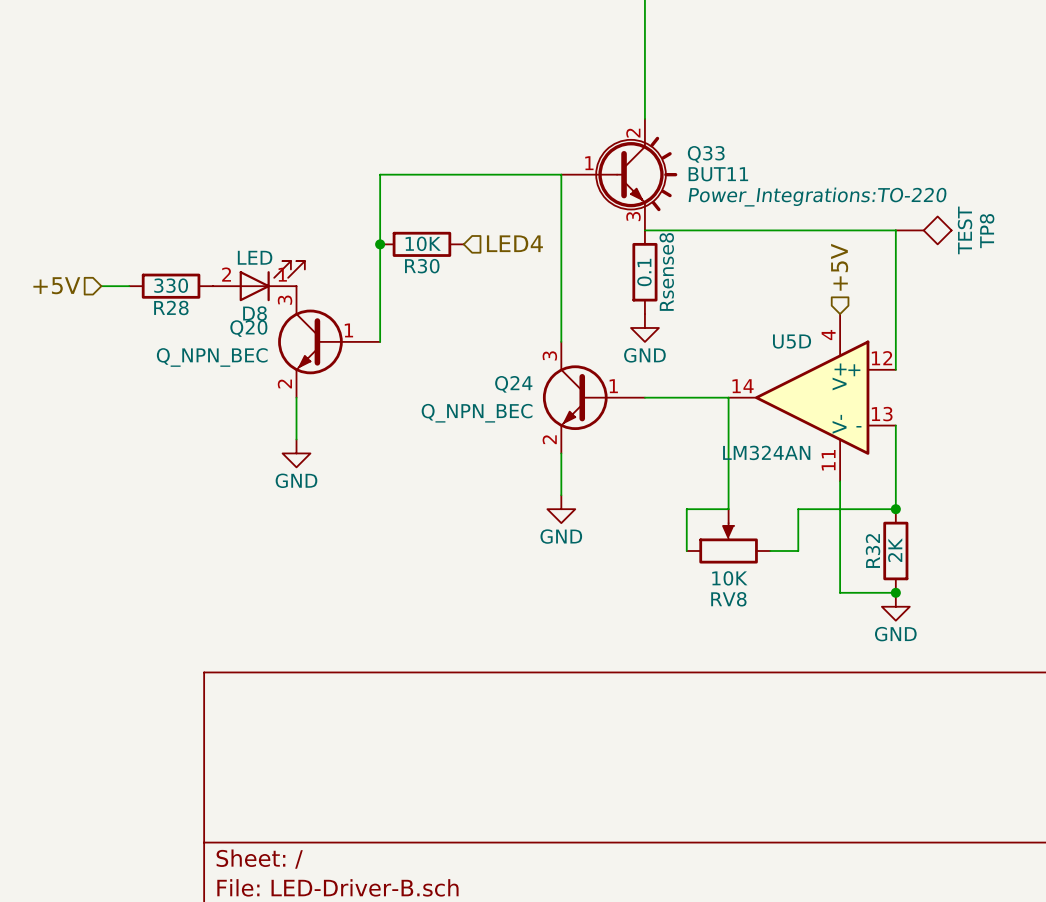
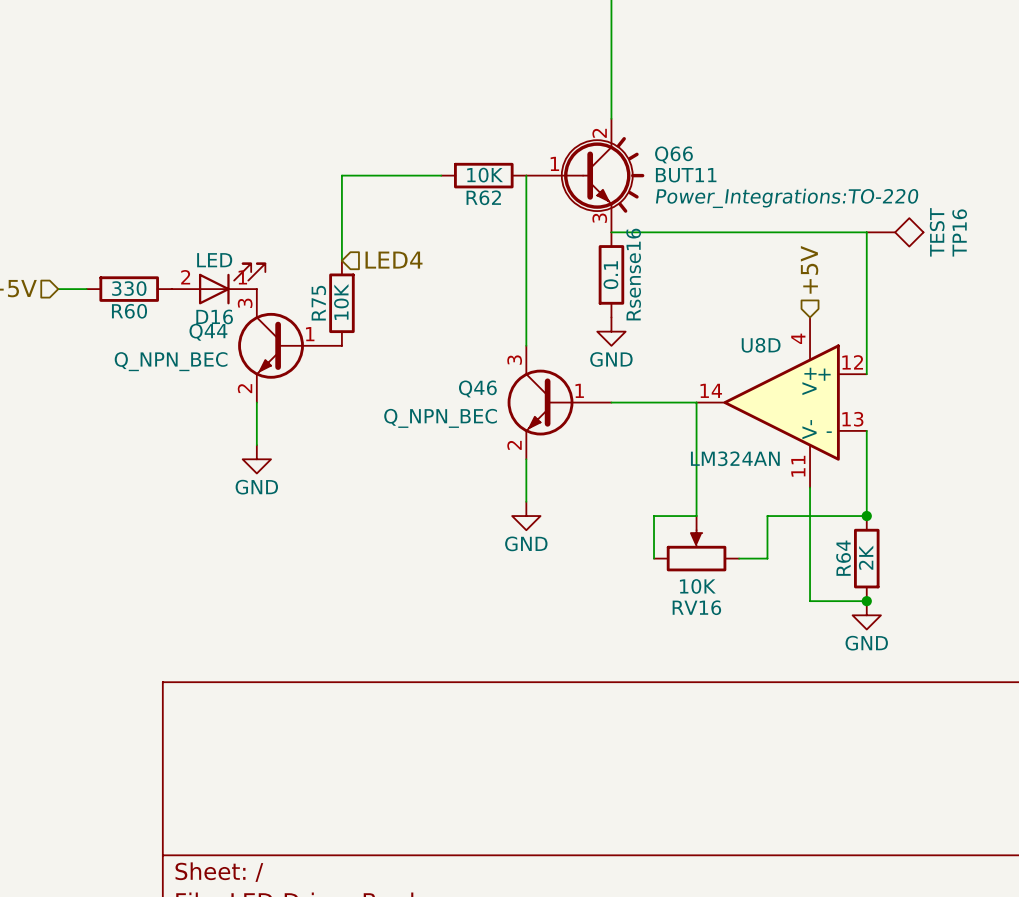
Q33 name: Q33 (706, 154) -> Q66 (673, 154)
wire: (477, 174) (561, 174) -> none
R62: none -> 10K (483, 175)
TP8 name: TP8 (987, 231) -> TP16 (959, 232)
hierarchical label position: LED4 (514, 243) -> LED4 (394, 260)
junction: (380, 244) -> none
R30: 10K (421, 244) -> none
wire: (380, 258) (380, 341) -> none
Rsense8 name: Rsense8 (666, 271) -> Rsense16 (633, 274)
R75: none -> 10K (341, 303)
R28 name: R28 (171, 307) -> R60 (129, 311)
D8 name: D8 (254, 313) -> D16 (214, 316)
Q20 name: Q20 (248, 328) -> Q44 (208, 332)
U5D name: U5D (792, 341) -> U8D (761, 345)
Q24 name: Q24 (513, 384) -> Q46 (477, 388)
R32 name: R32 (873, 551) -> R64 (843, 558)
RV8 name: RV8 (728, 599) -> RV16 (696, 607)

